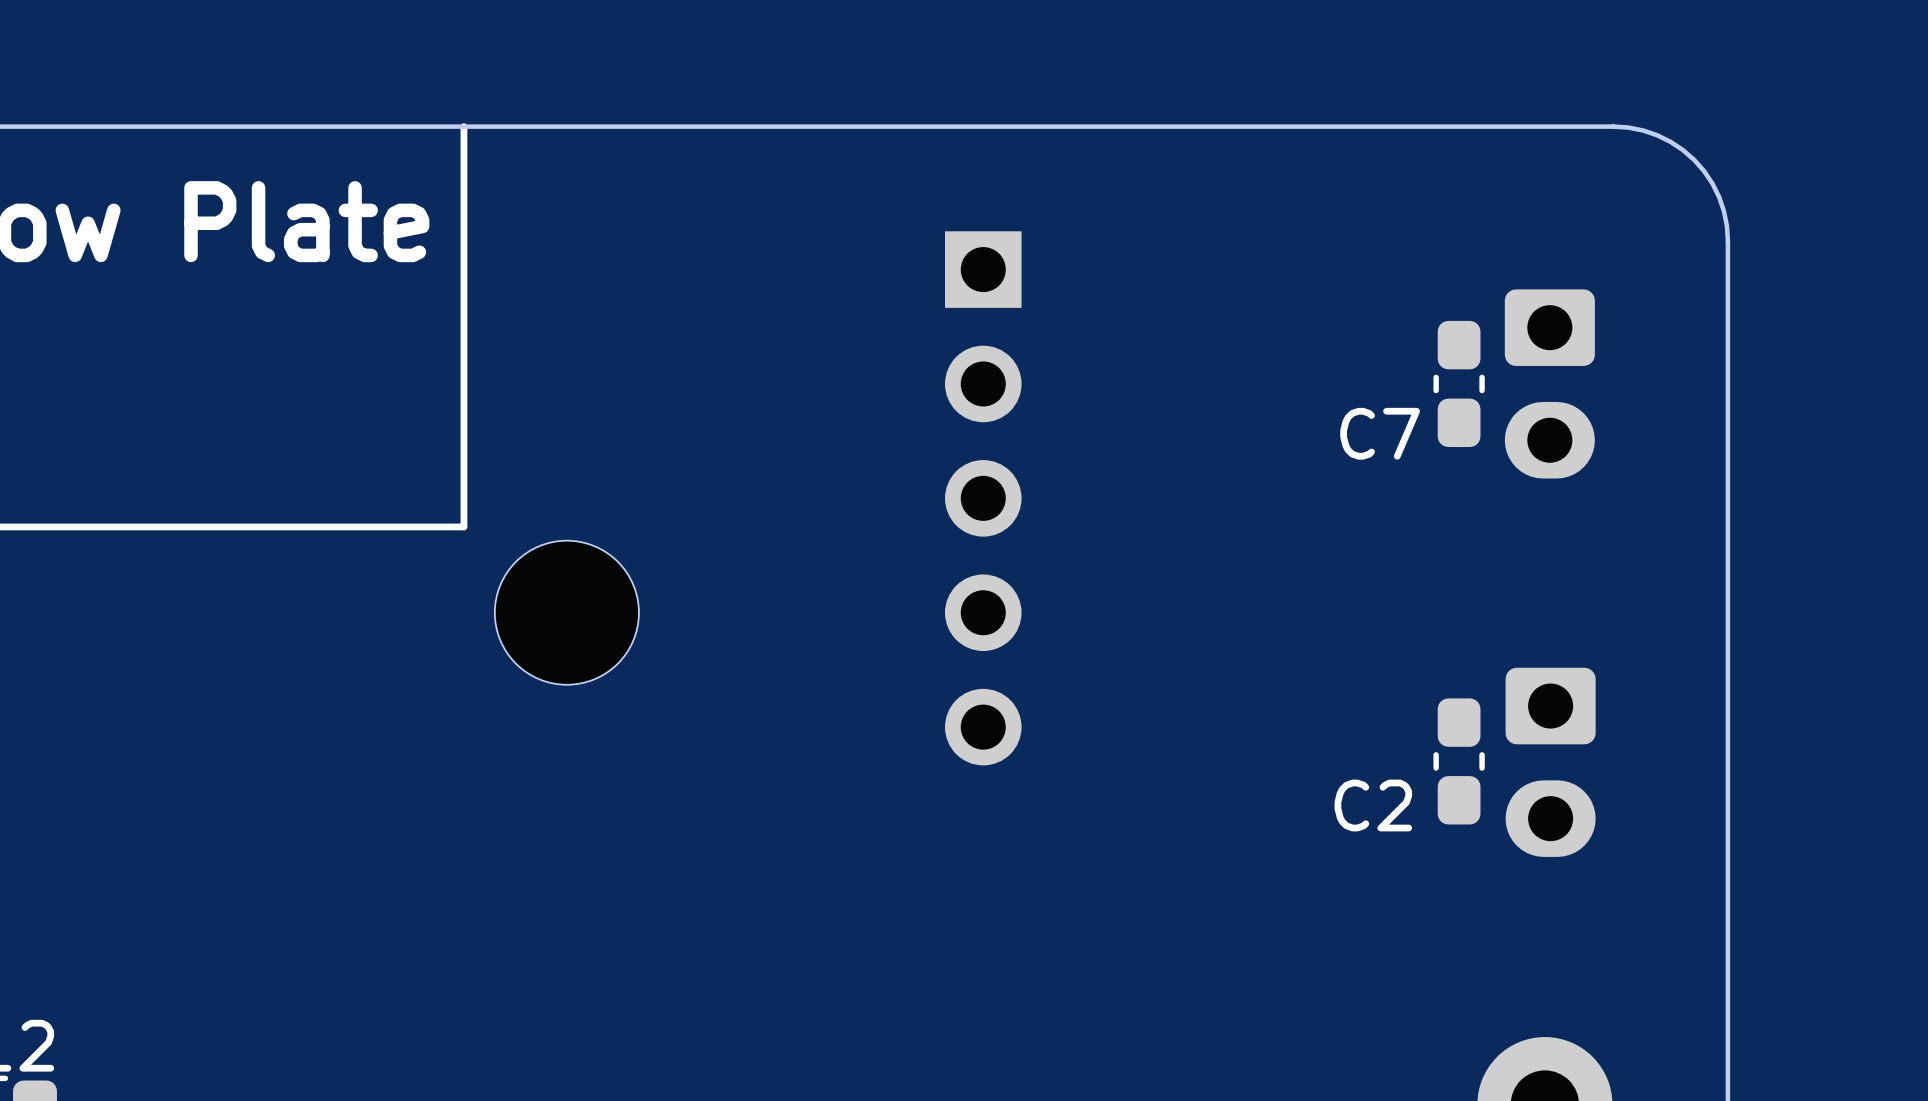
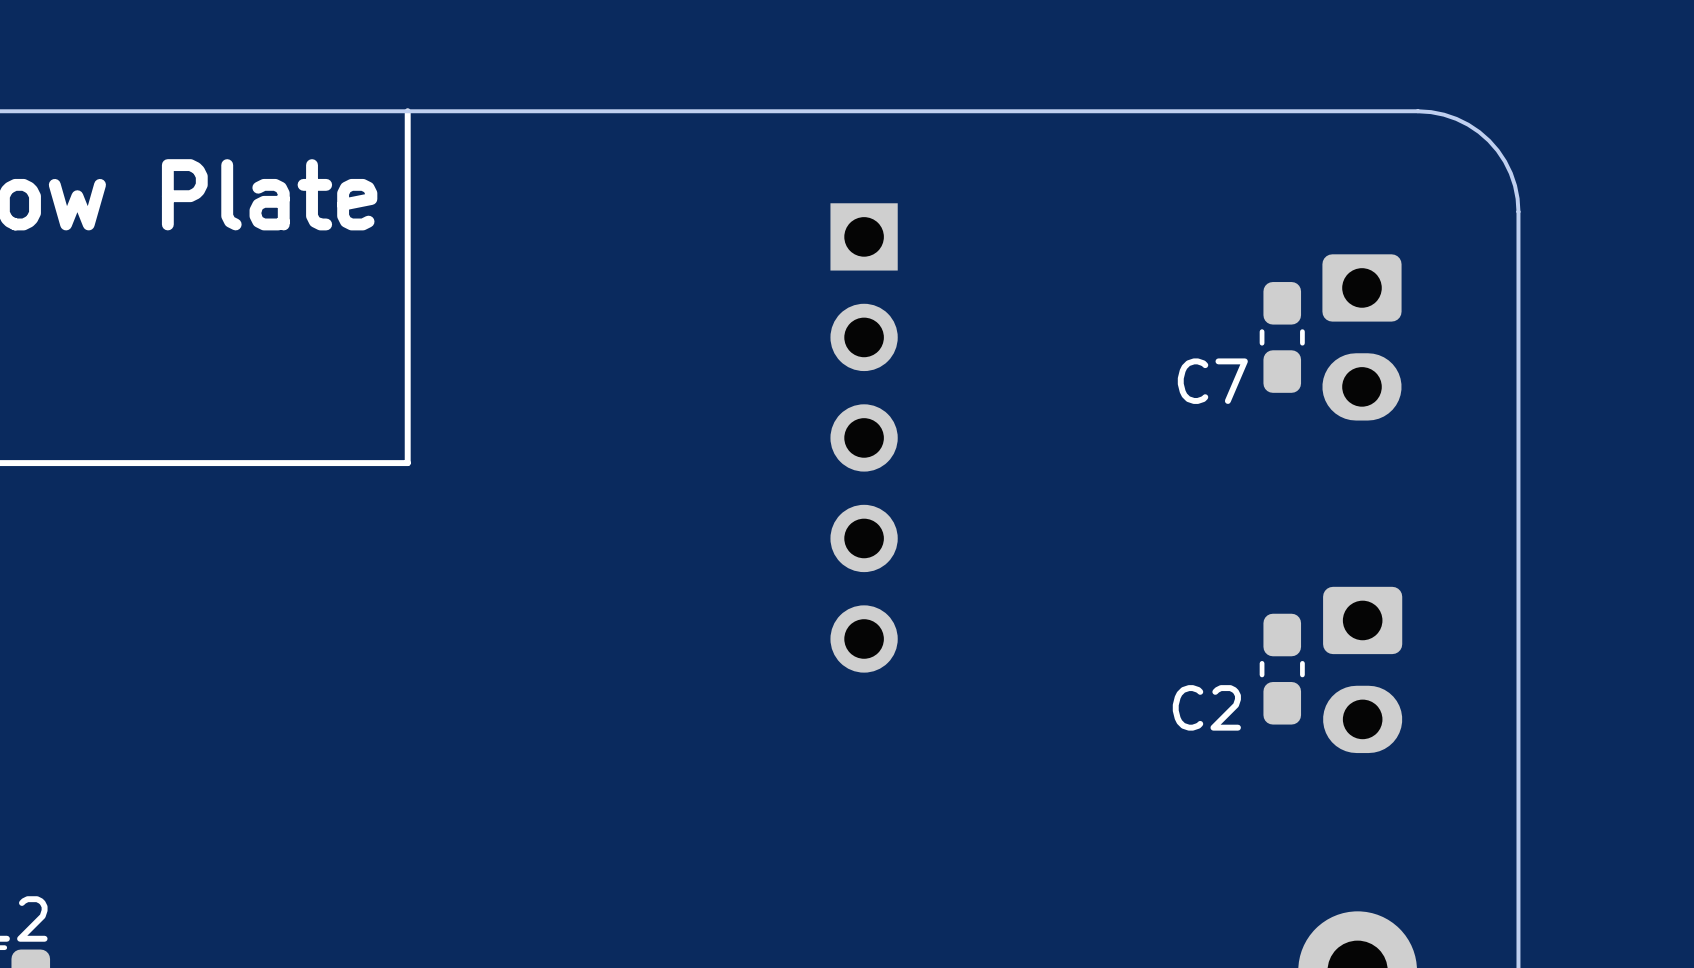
part: (566, 612) -> none

